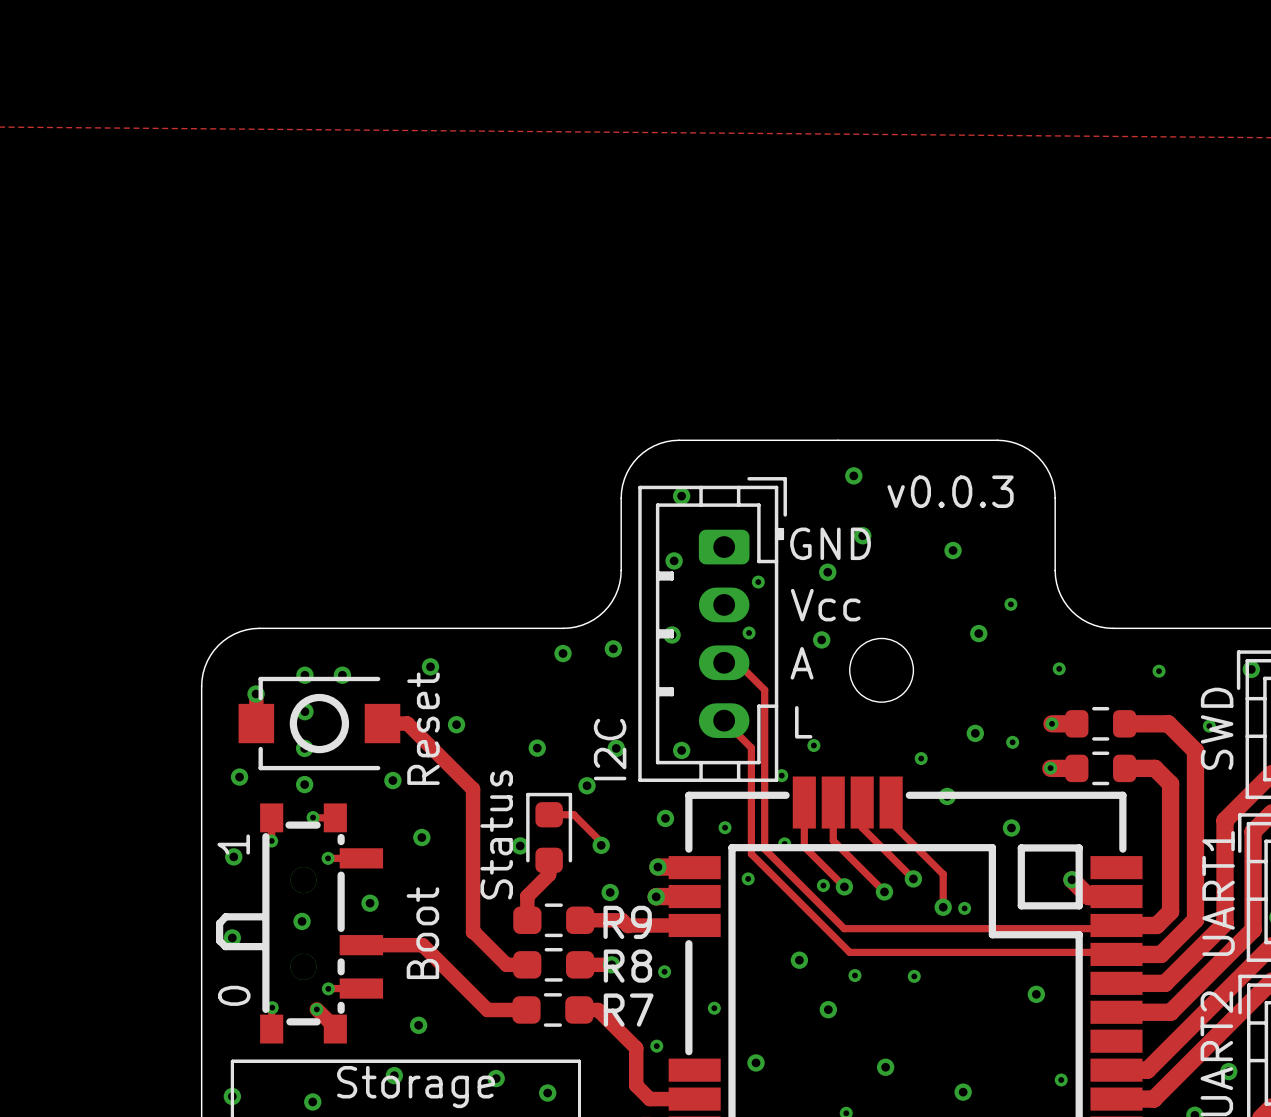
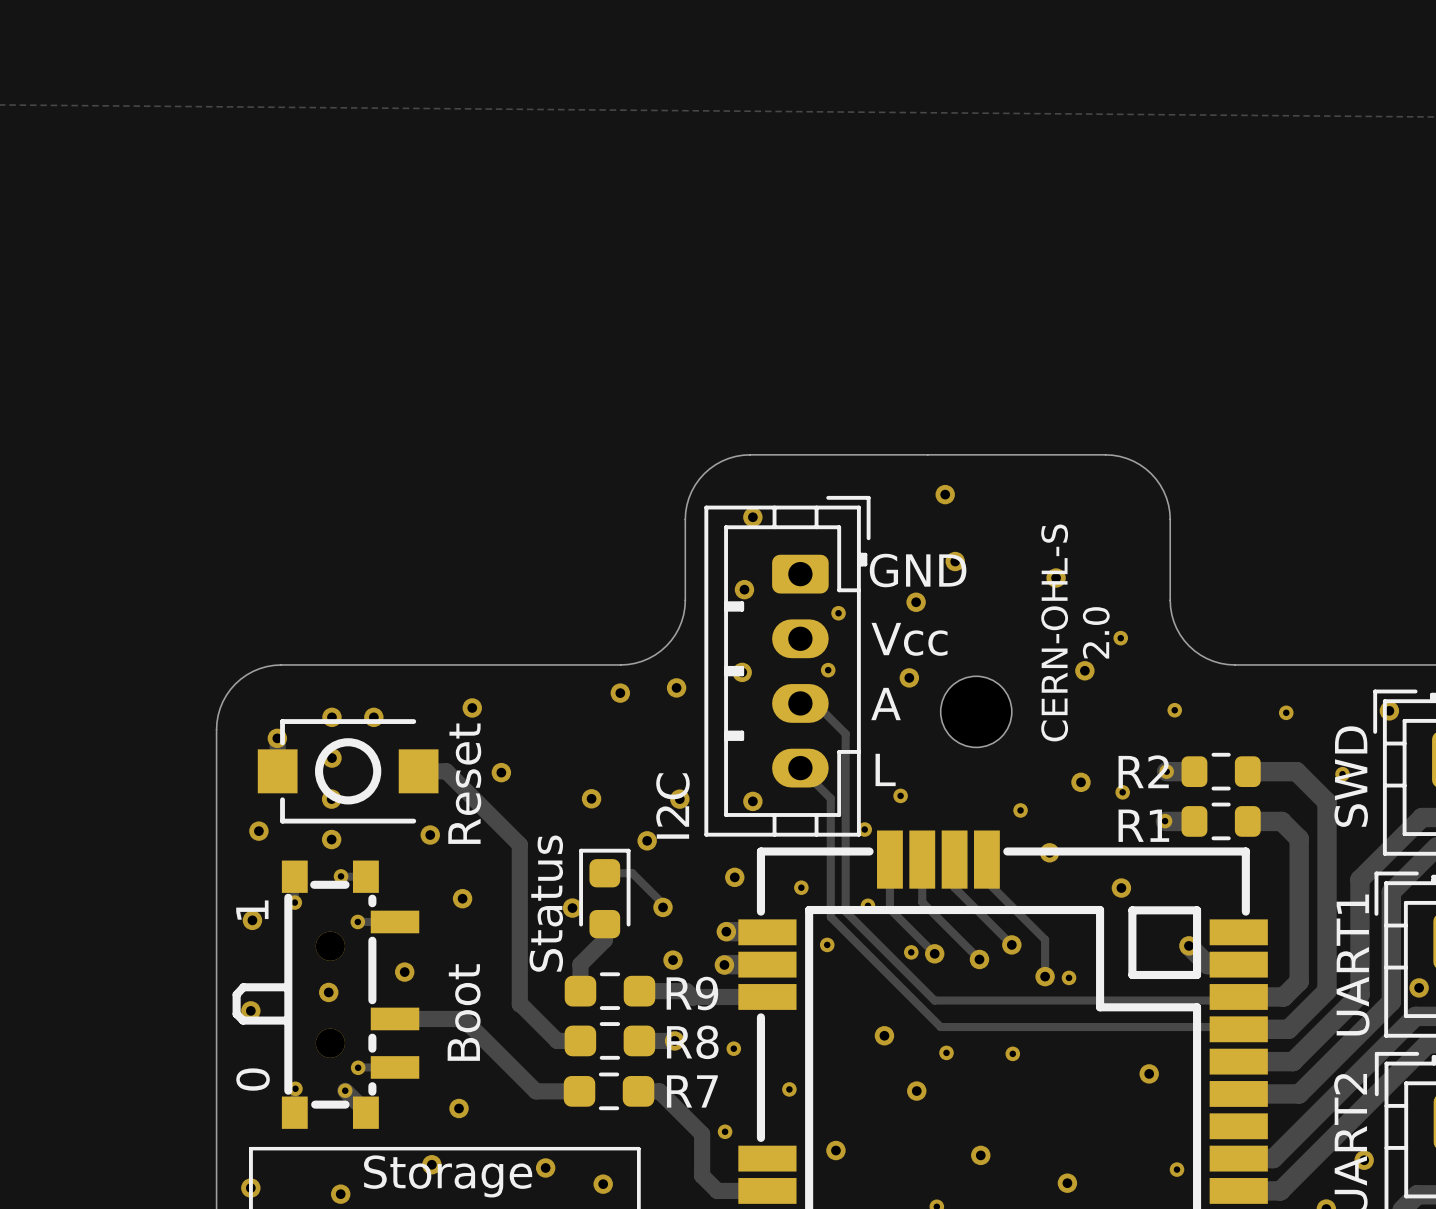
text: v0.0.3 (950, 491) -> none
text: none -> CERN-OHL-S (1054, 632)
text: none -> 2.0 (1096, 632)
R2 name: none -> R2 (1143, 771)
R1 name: none -> R1 (1143, 825)

